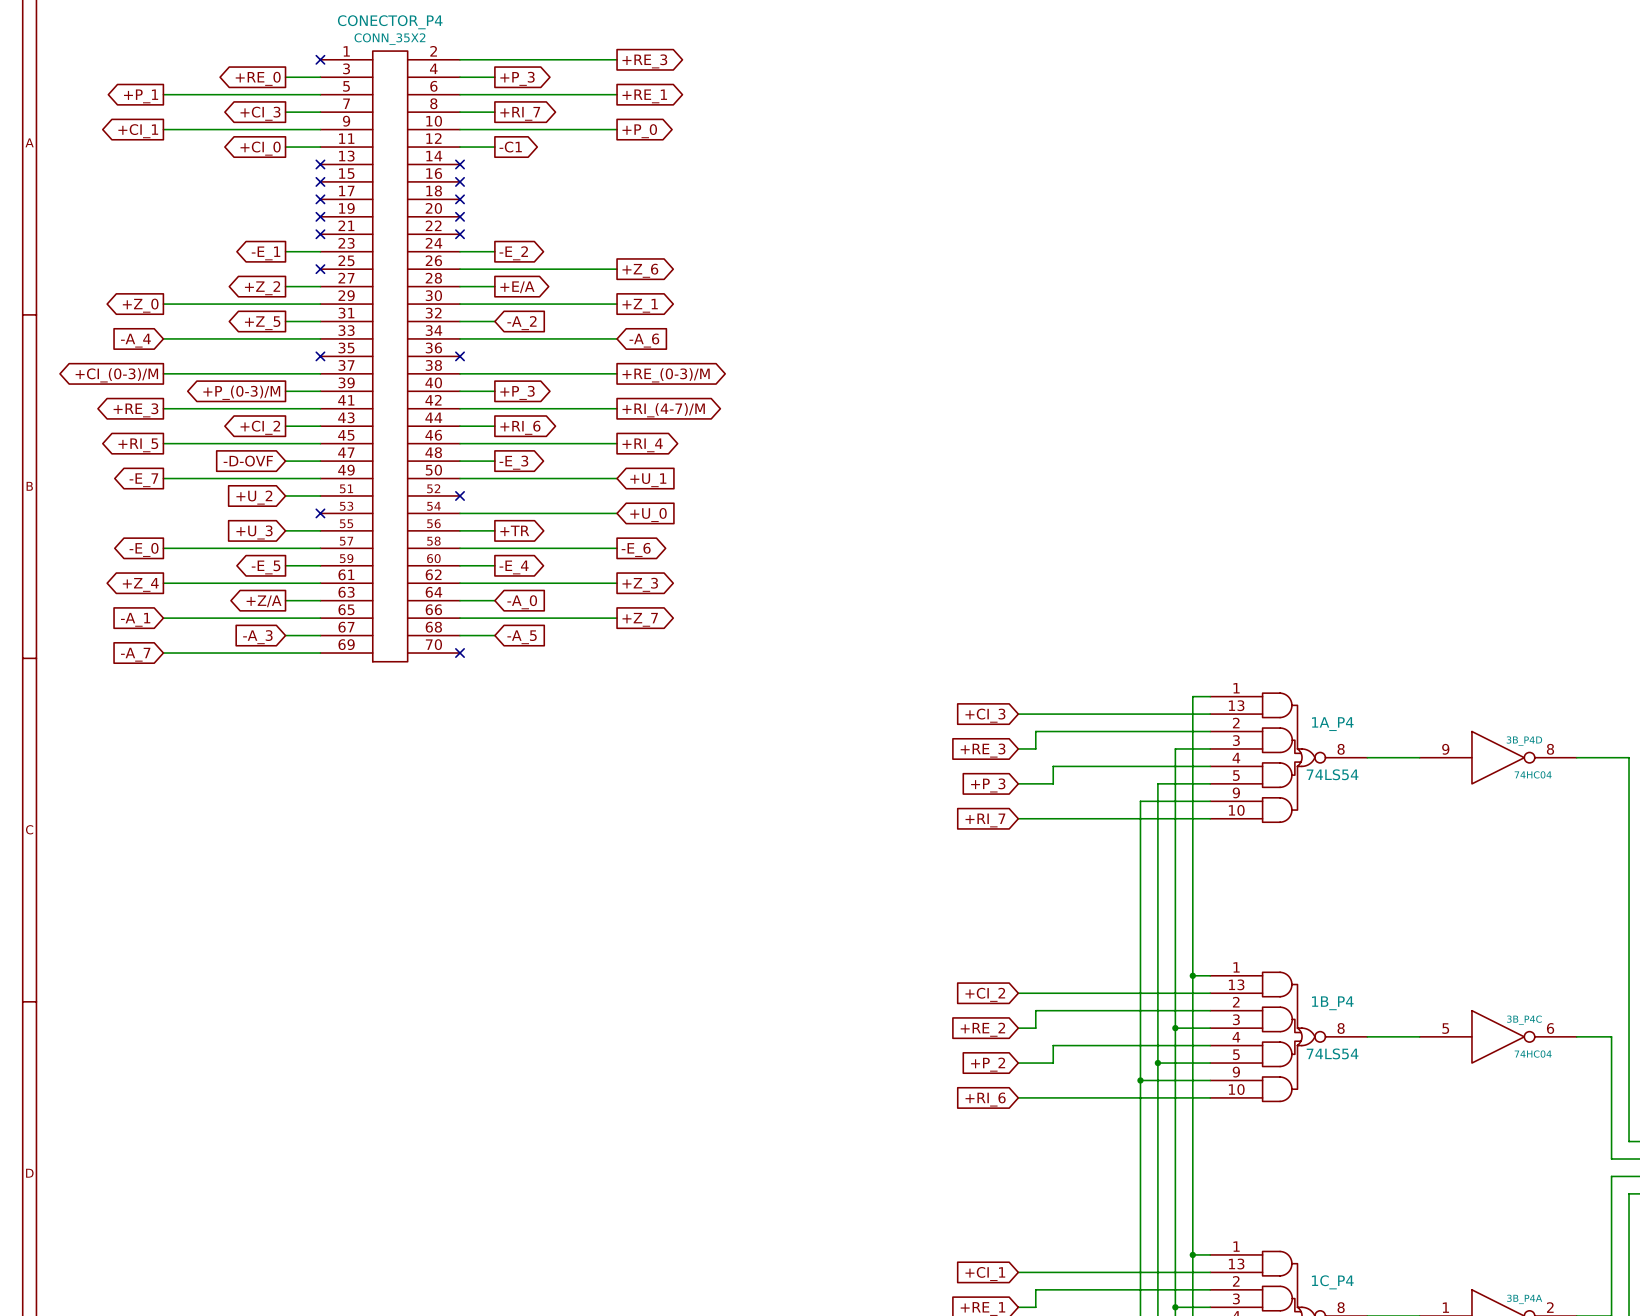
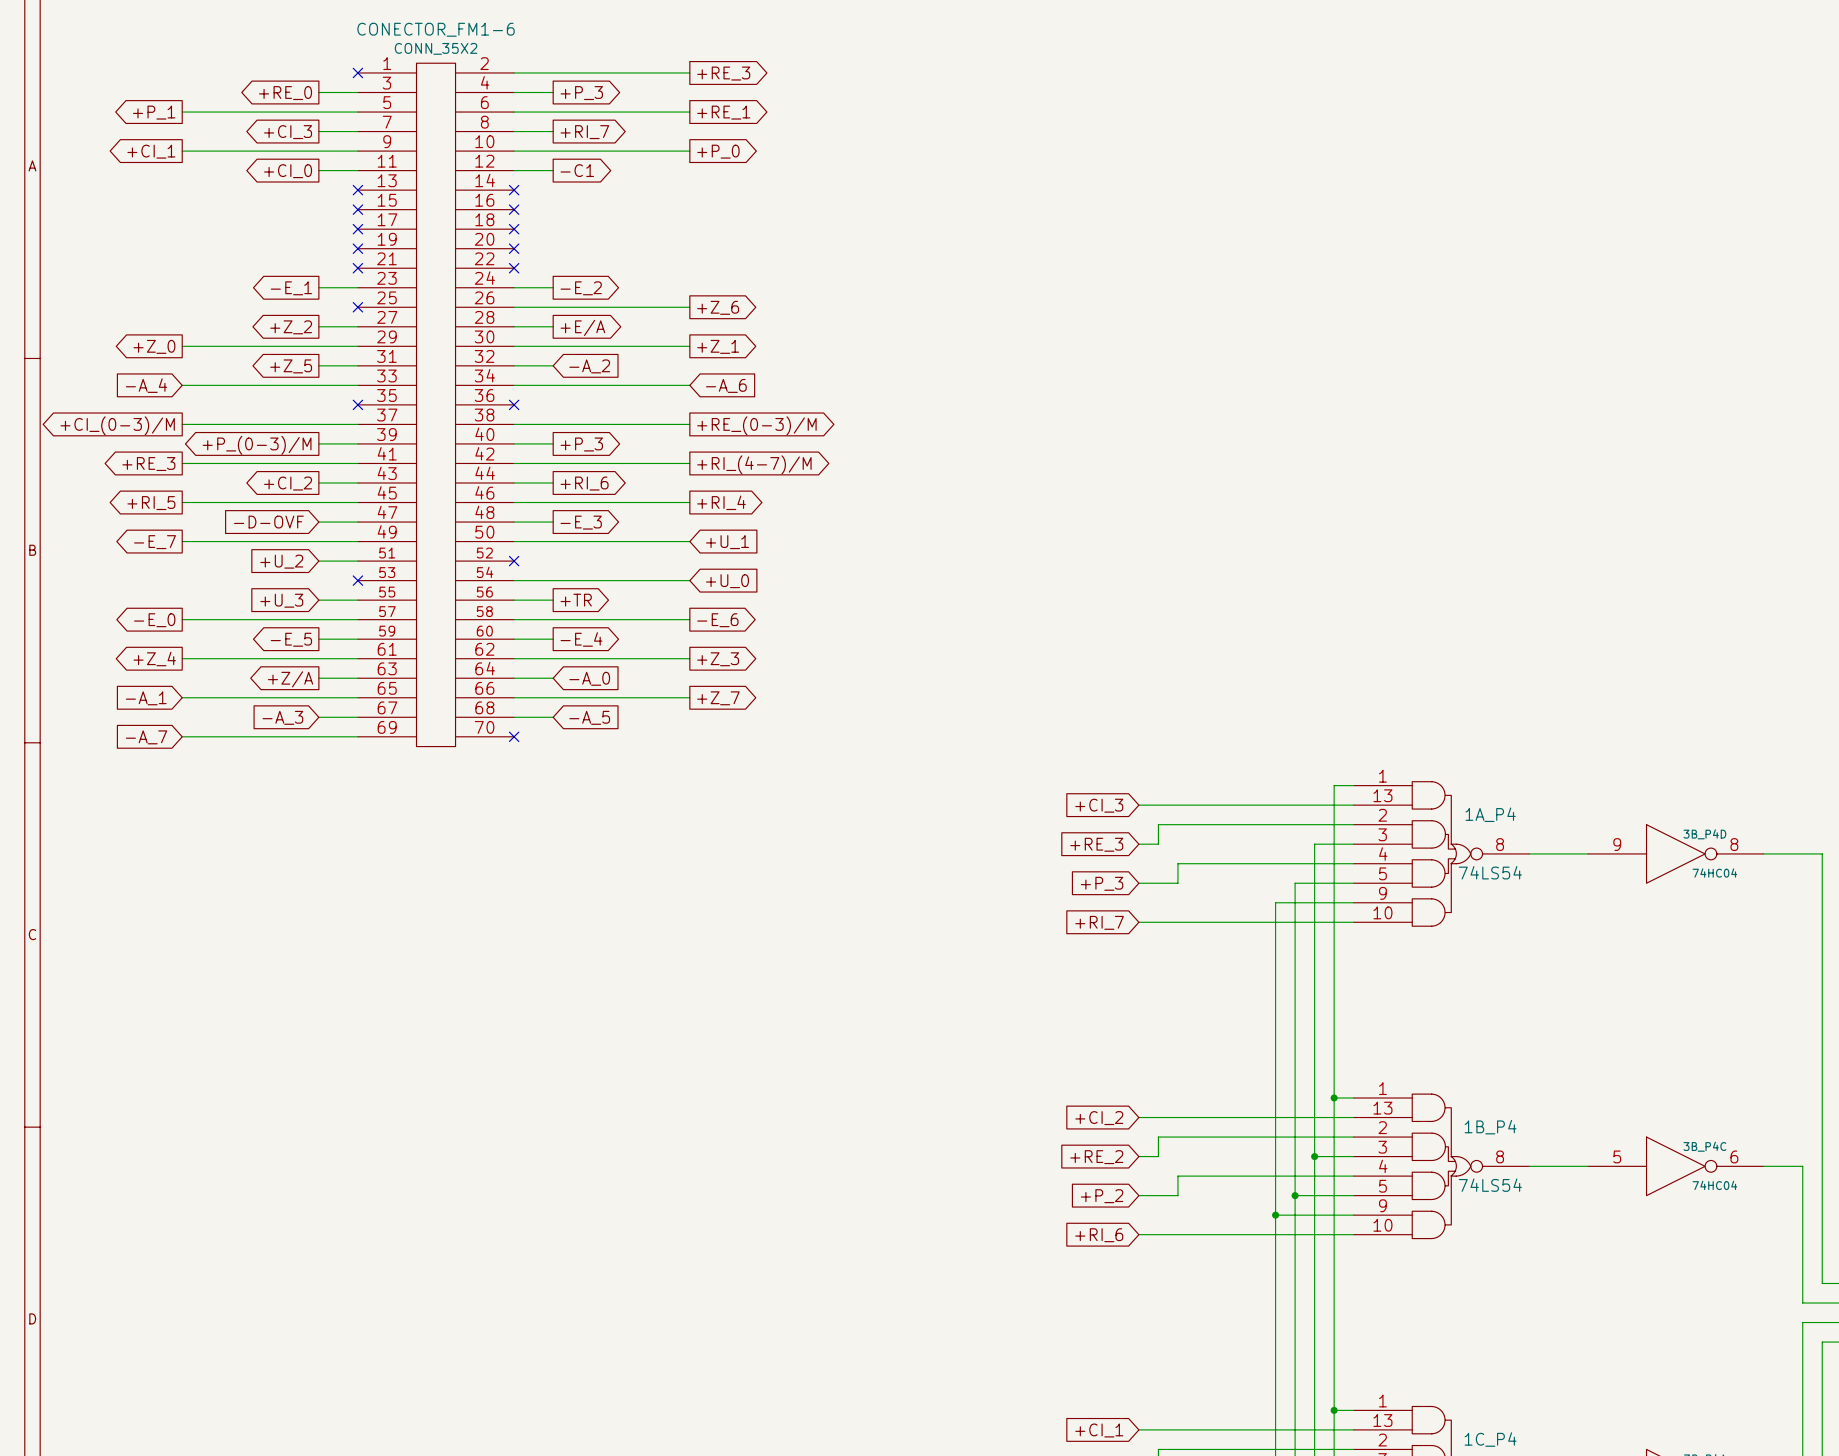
CONECTOR_P4 name: CONECTOR_P4 (390, 22) -> CONECTOR_FM1-6 (436, 29)

